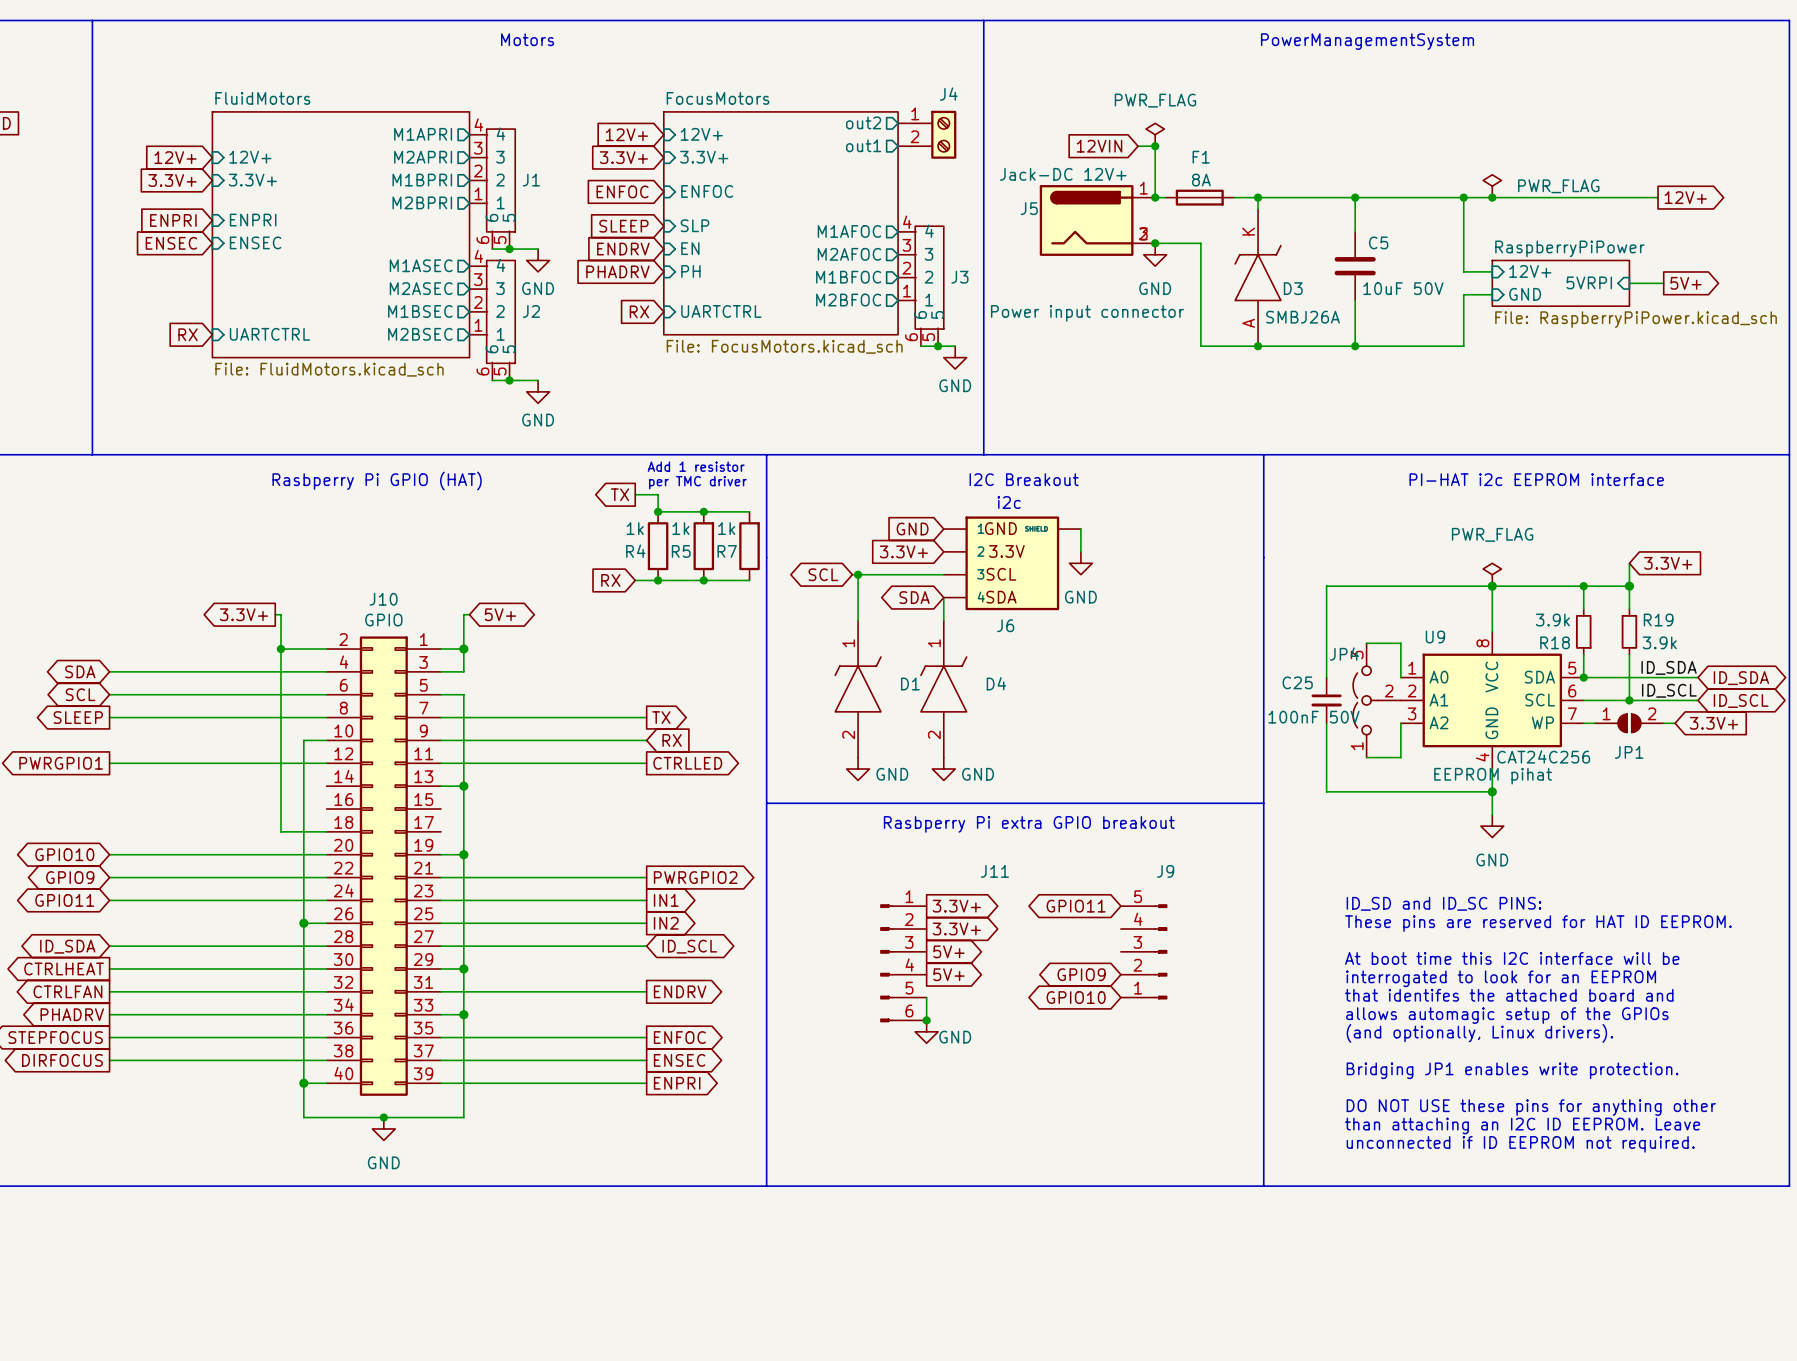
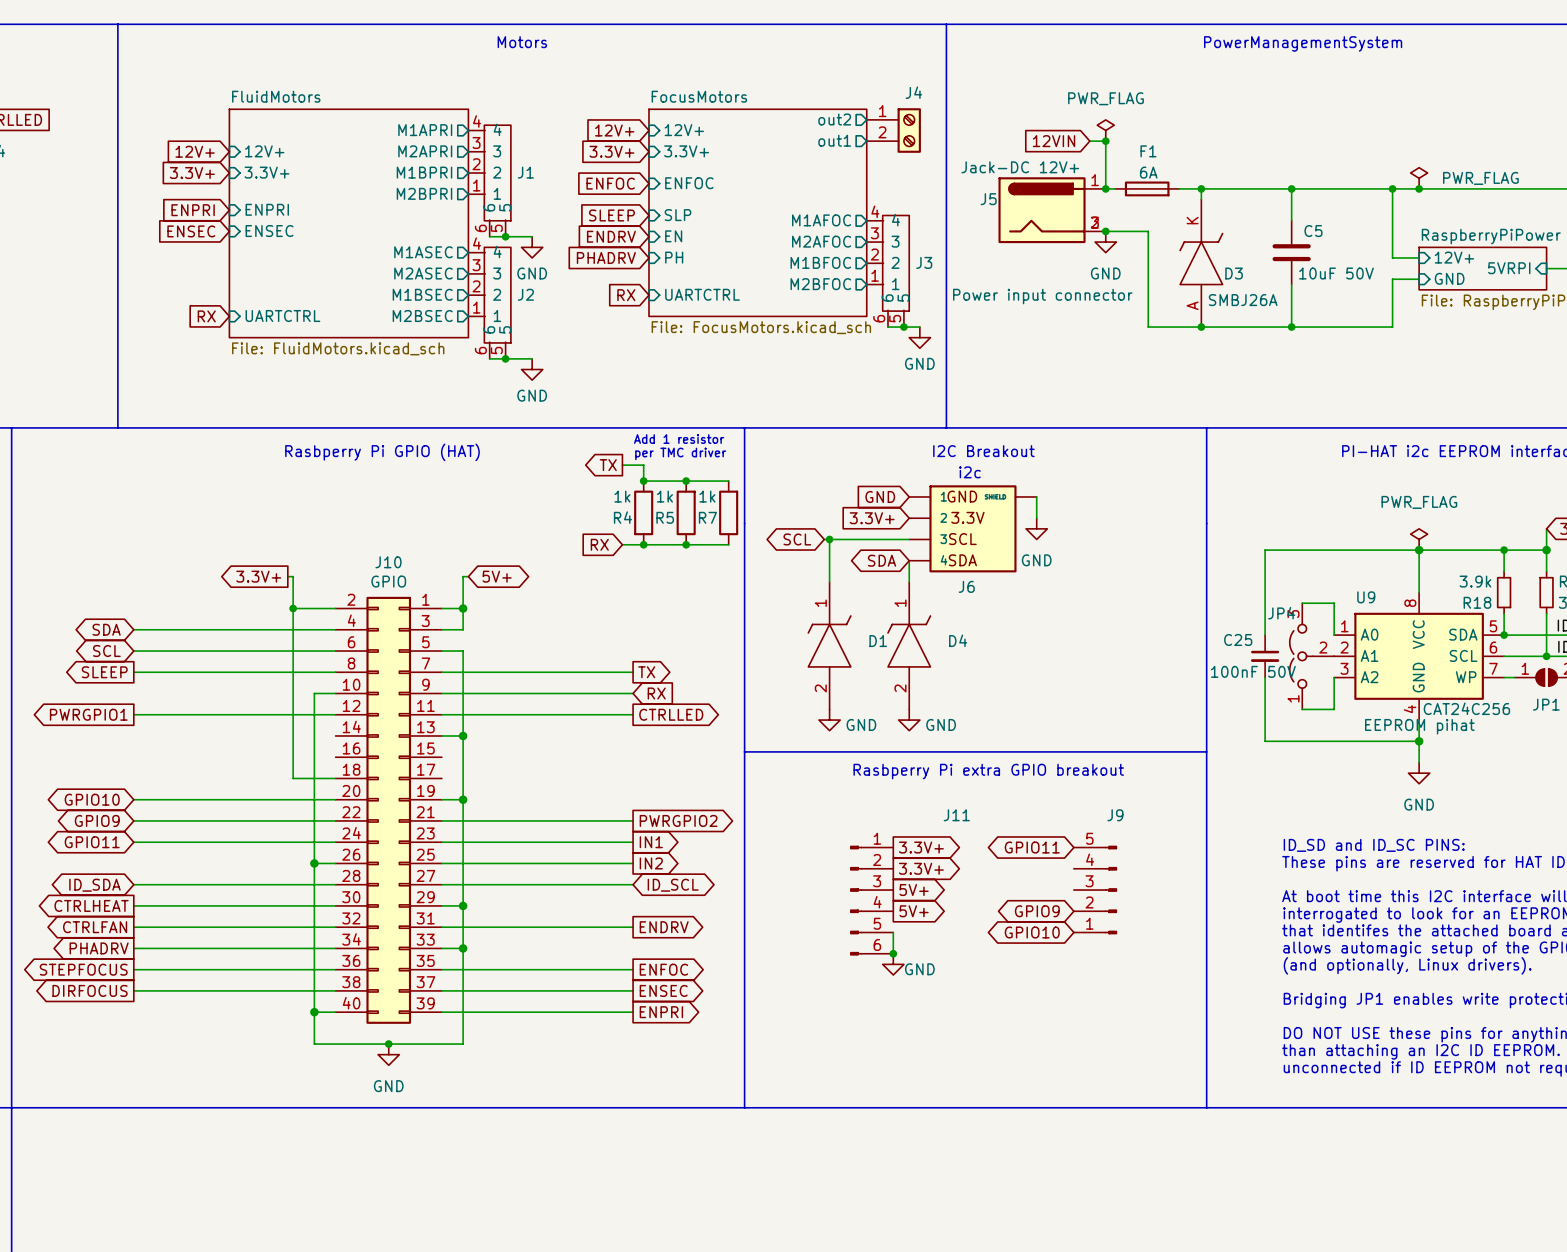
F1 value: 8A (1201, 180) -> 6A (1148, 172)

